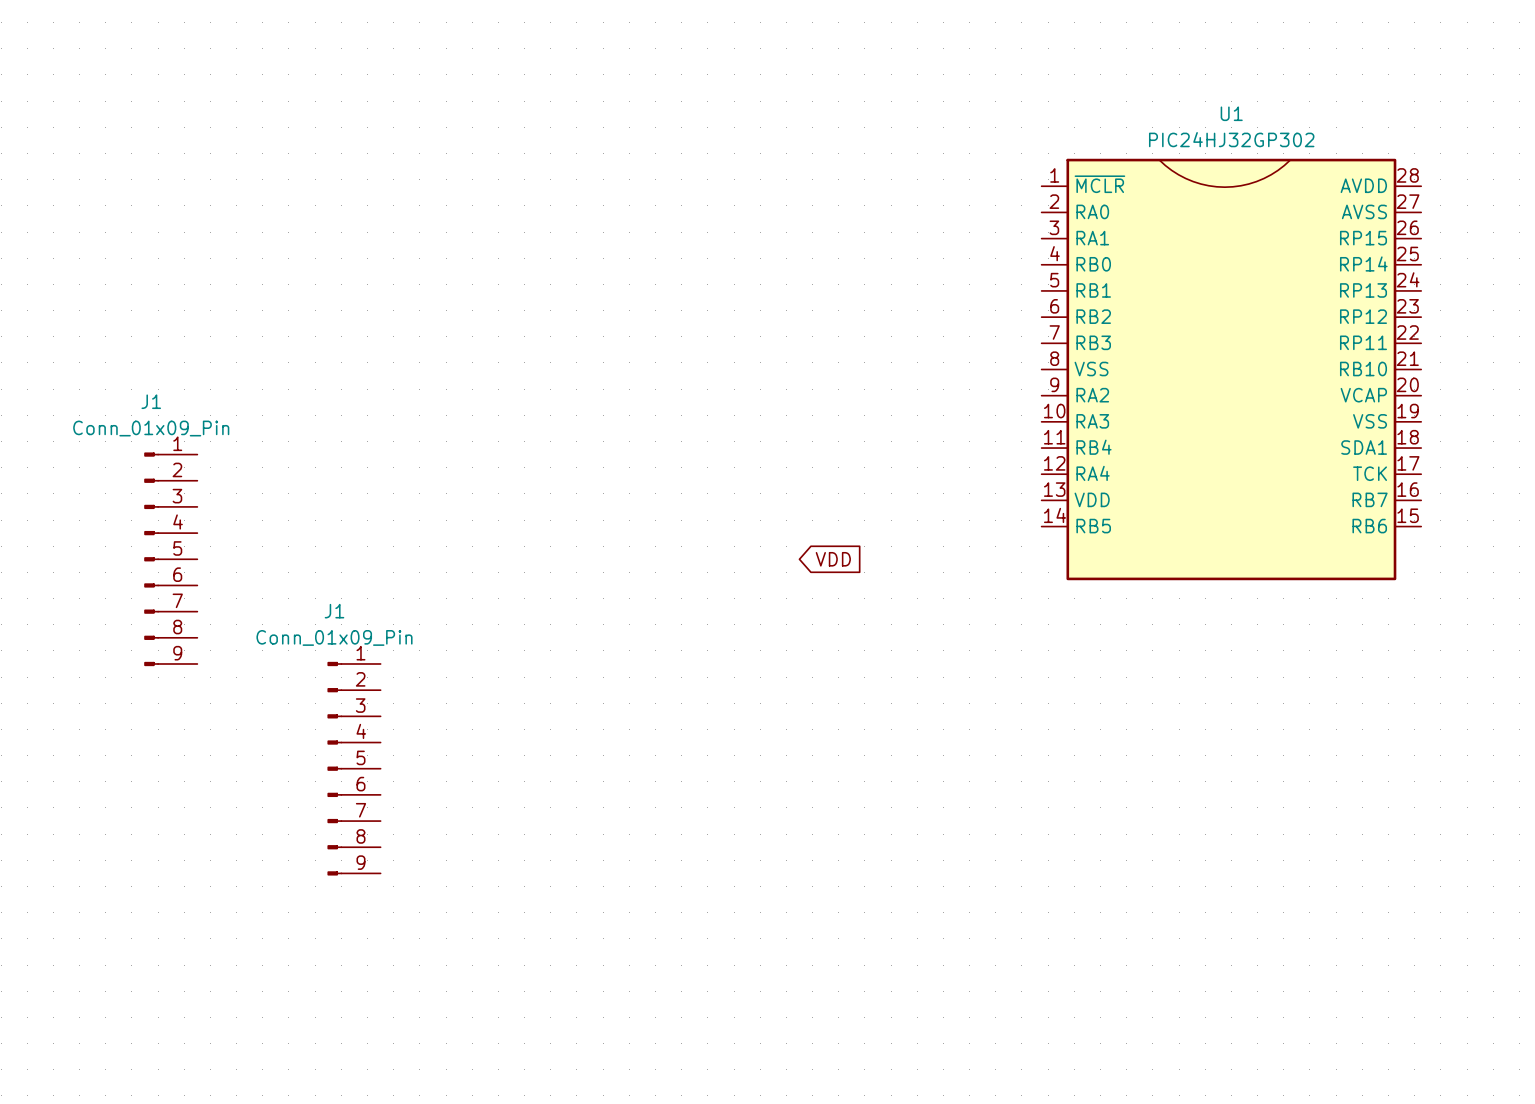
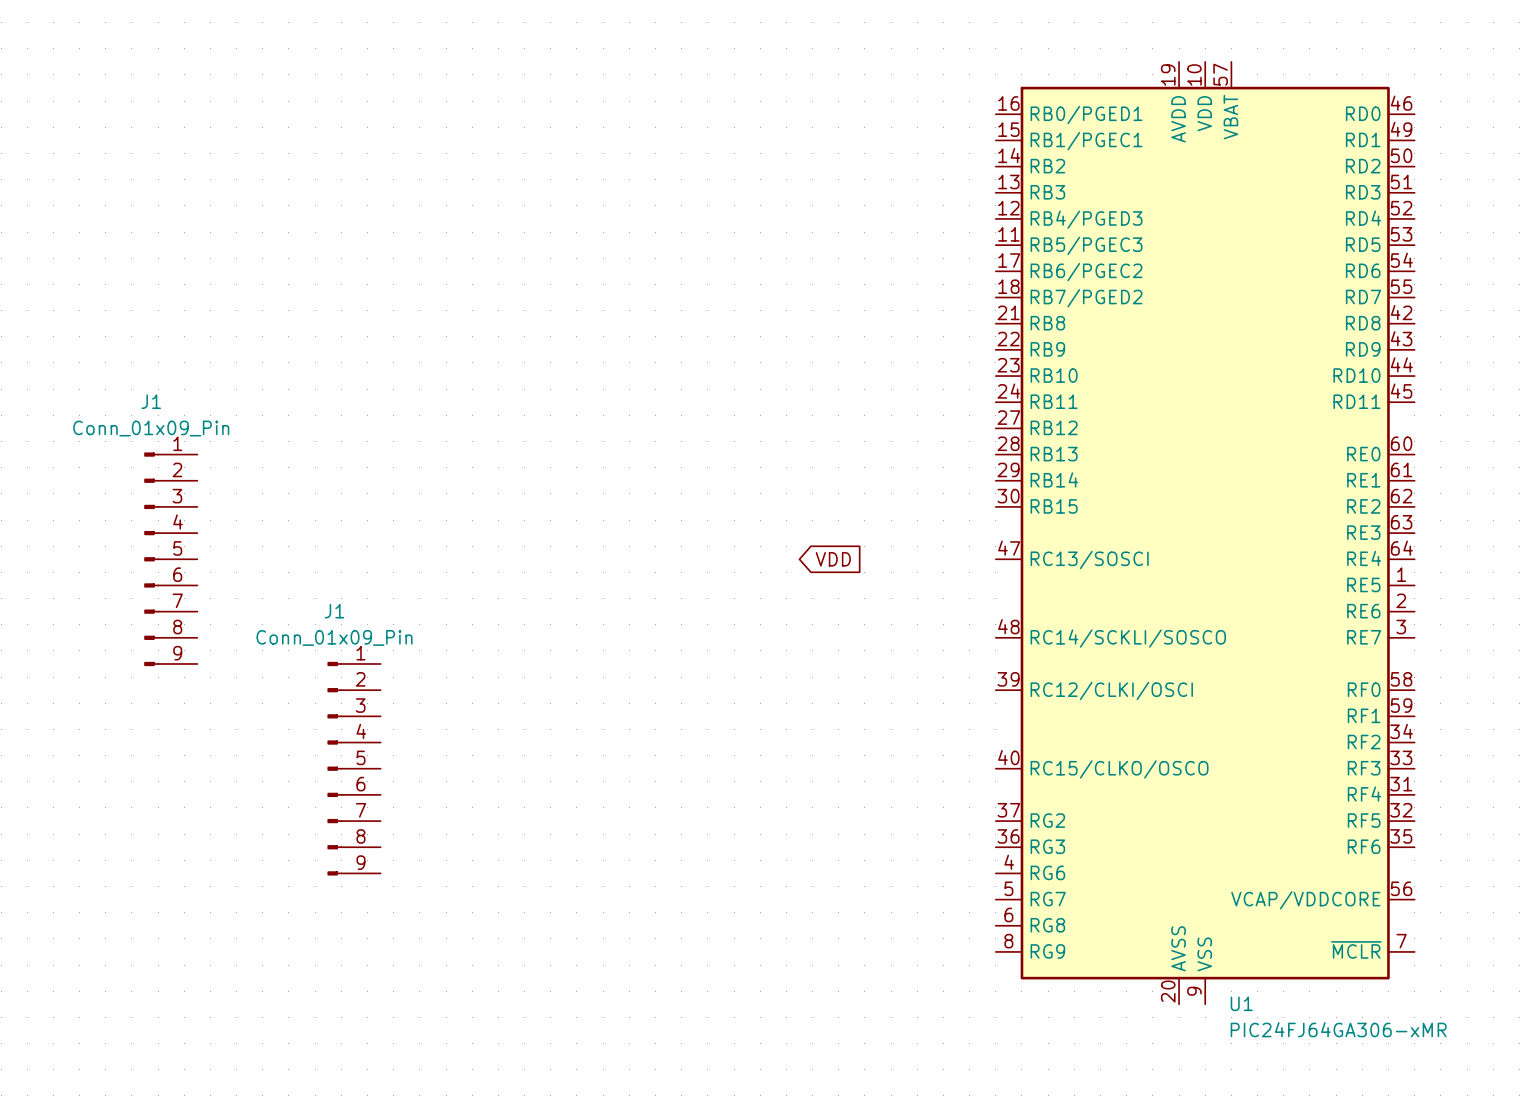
U1 name position: U1 (1231, 113) -> U1 (1241, 1003)
U1 value: PIC24HJ32GP302 (1231, 139) -> PIC24FJ64GA306-xMR (1338, 1029)
U1 symbol: [1041, 158, 1422, 581] -> [995, 61, 1415, 1005]

